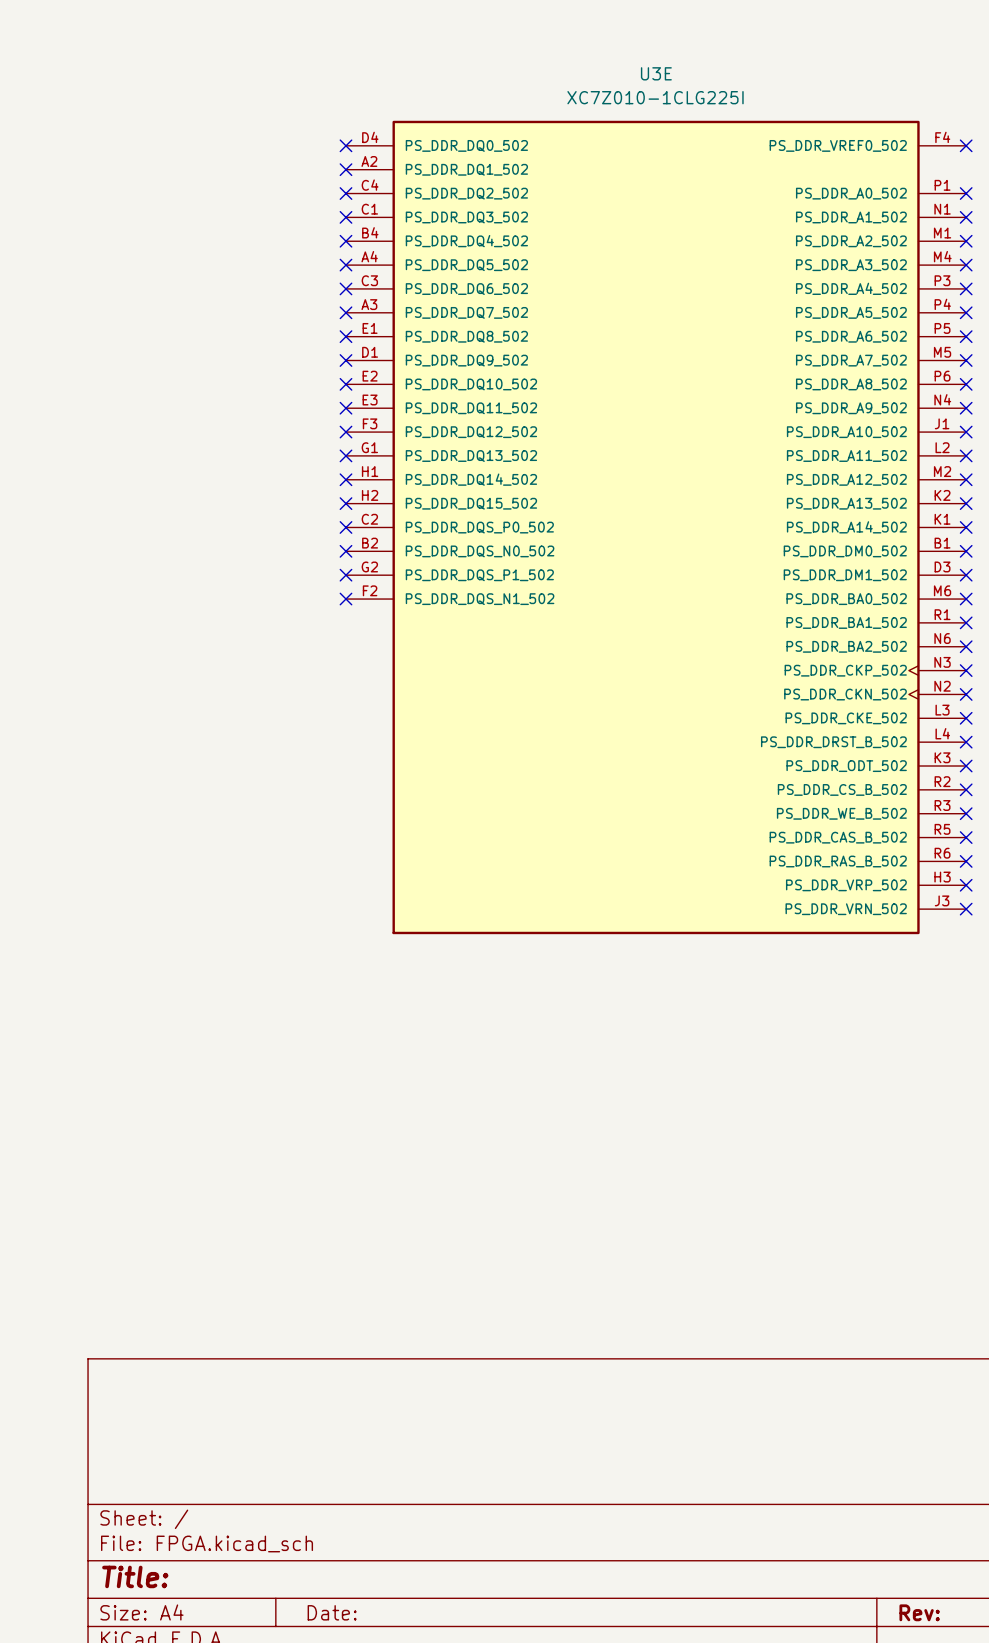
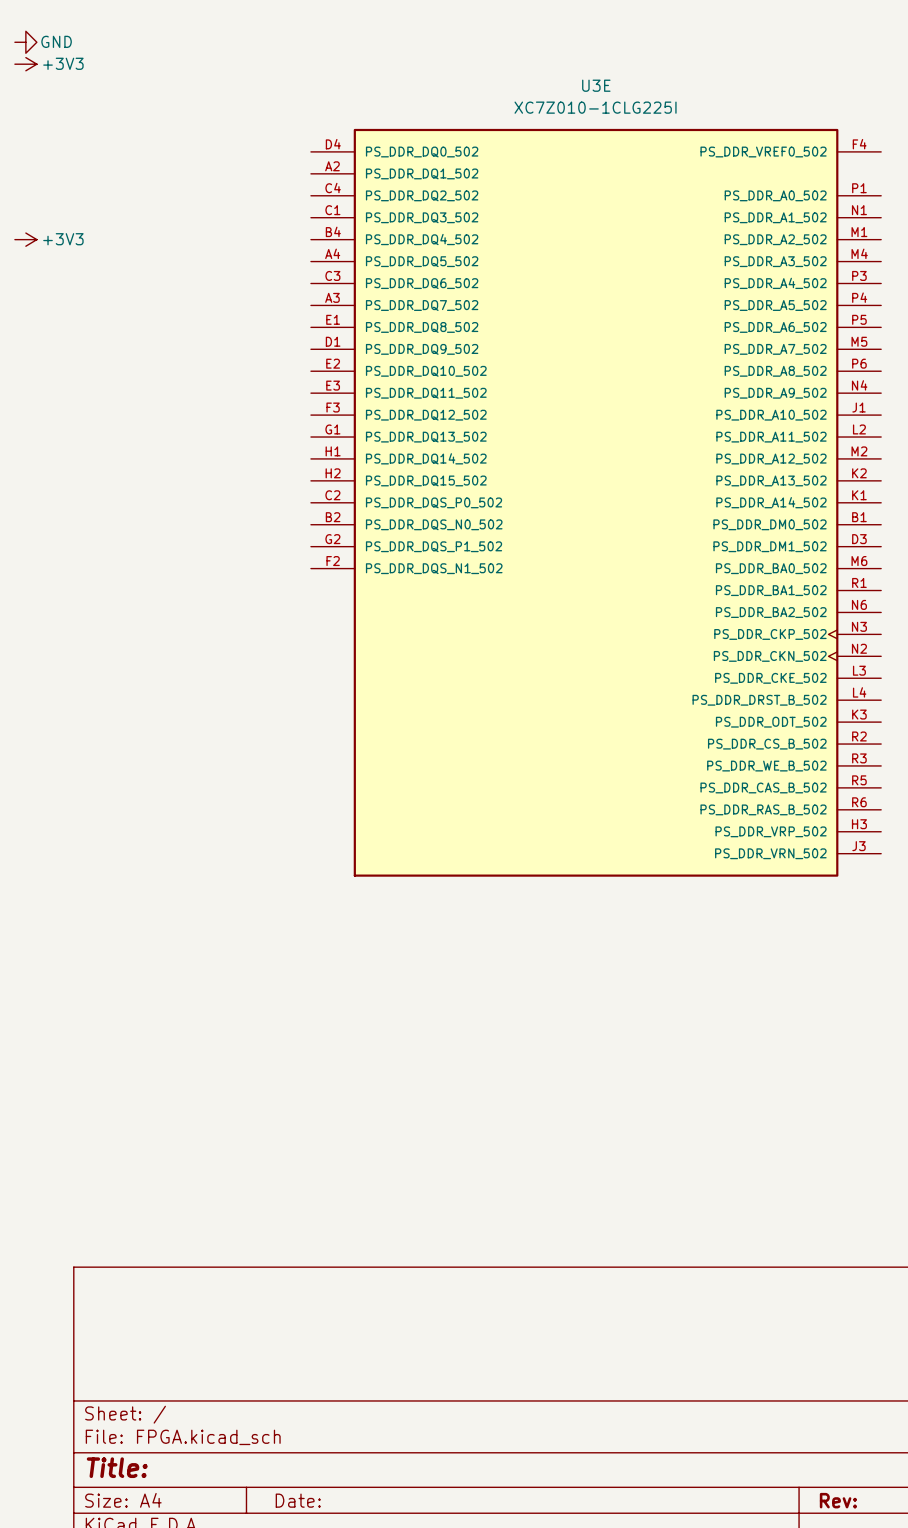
power symbol: none -> GND (25, 42)
power symbol: none -> +3V3 (25, 64)
no-connect mark: (345, 145) -> none
no-connect mark: (966, 145) -> none
no-connect mark: (345, 169) -> none
no-connect mark: (345, 193) -> none
no-connect mark: (966, 193) -> none
no-connect mark: (345, 217) -> none
no-connect mark: (966, 217) -> none
power symbol: none -> +3V3 (25, 239)
no-connect mark: (345, 241) -> none
no-connect mark: (966, 241) -> none
no-connect mark: (345, 265) -> none
no-connect mark: (966, 265) -> none
no-connect mark: (345, 288) -> none
no-connect mark: (966, 288) -> none
no-connect mark: (345, 312) -> none
no-connect mark: (966, 312) -> none
no-connect mark: (345, 336) -> none
no-connect mark: (966, 336) -> none
no-connect mark: (345, 360) -> none
no-connect mark: (966, 360) -> none
no-connect mark: (345, 384) -> none
no-connect mark: (966, 384) -> none
no-connect mark: (345, 408) -> none
no-connect mark: (966, 408) -> none
no-connect mark: (345, 432) -> none
no-connect mark: (966, 432) -> none
no-connect mark: (345, 455) -> none
no-connect mark: (966, 455) -> none
no-connect mark: (345, 479) -> none
no-connect mark: (966, 479) -> none
no-connect mark: (345, 503) -> none
no-connect mark: (966, 503) -> none
no-connect mark: (345, 527) -> none
no-connect mark: (966, 527) -> none
no-connect mark: (345, 551) -> none
no-connect mark: (966, 551) -> none
no-connect mark: (345, 575) -> none
no-connect mark: (966, 575) -> none
no-connect mark: (345, 599) -> none
no-connect mark: (966, 599) -> none
no-connect mark: (966, 622) -> none
no-connect mark: (966, 646) -> none
no-connect mark: (966, 670) -> none
no-connect mark: (966, 694) -> none
no-connect mark: (966, 718) -> none
no-connect mark: (966, 742) -> none
no-connect mark: (966, 766) -> none
no-connect mark: (966, 789) -> none
no-connect mark: (966, 813) -> none
no-connect mark: (966, 837) -> none
no-connect mark: (966, 861) -> none
no-connect mark: (966, 885) -> none
no-connect mark: (966, 909) -> none

